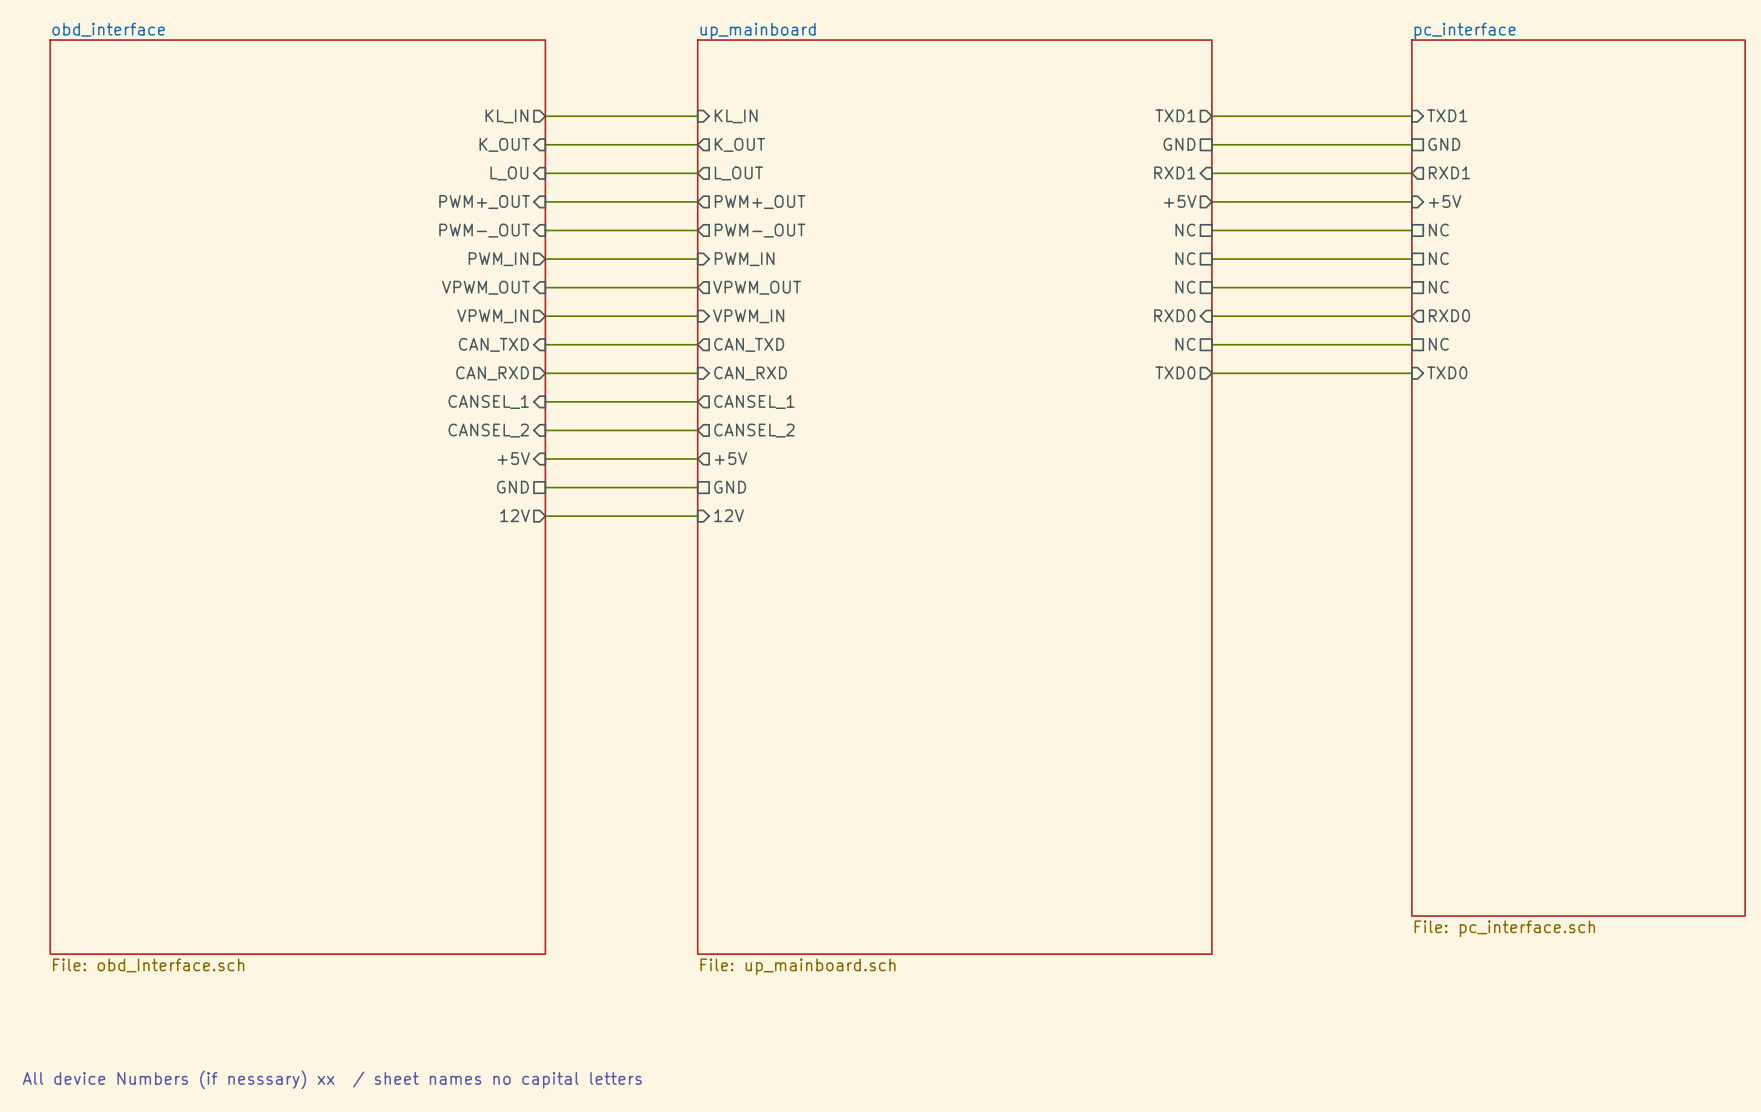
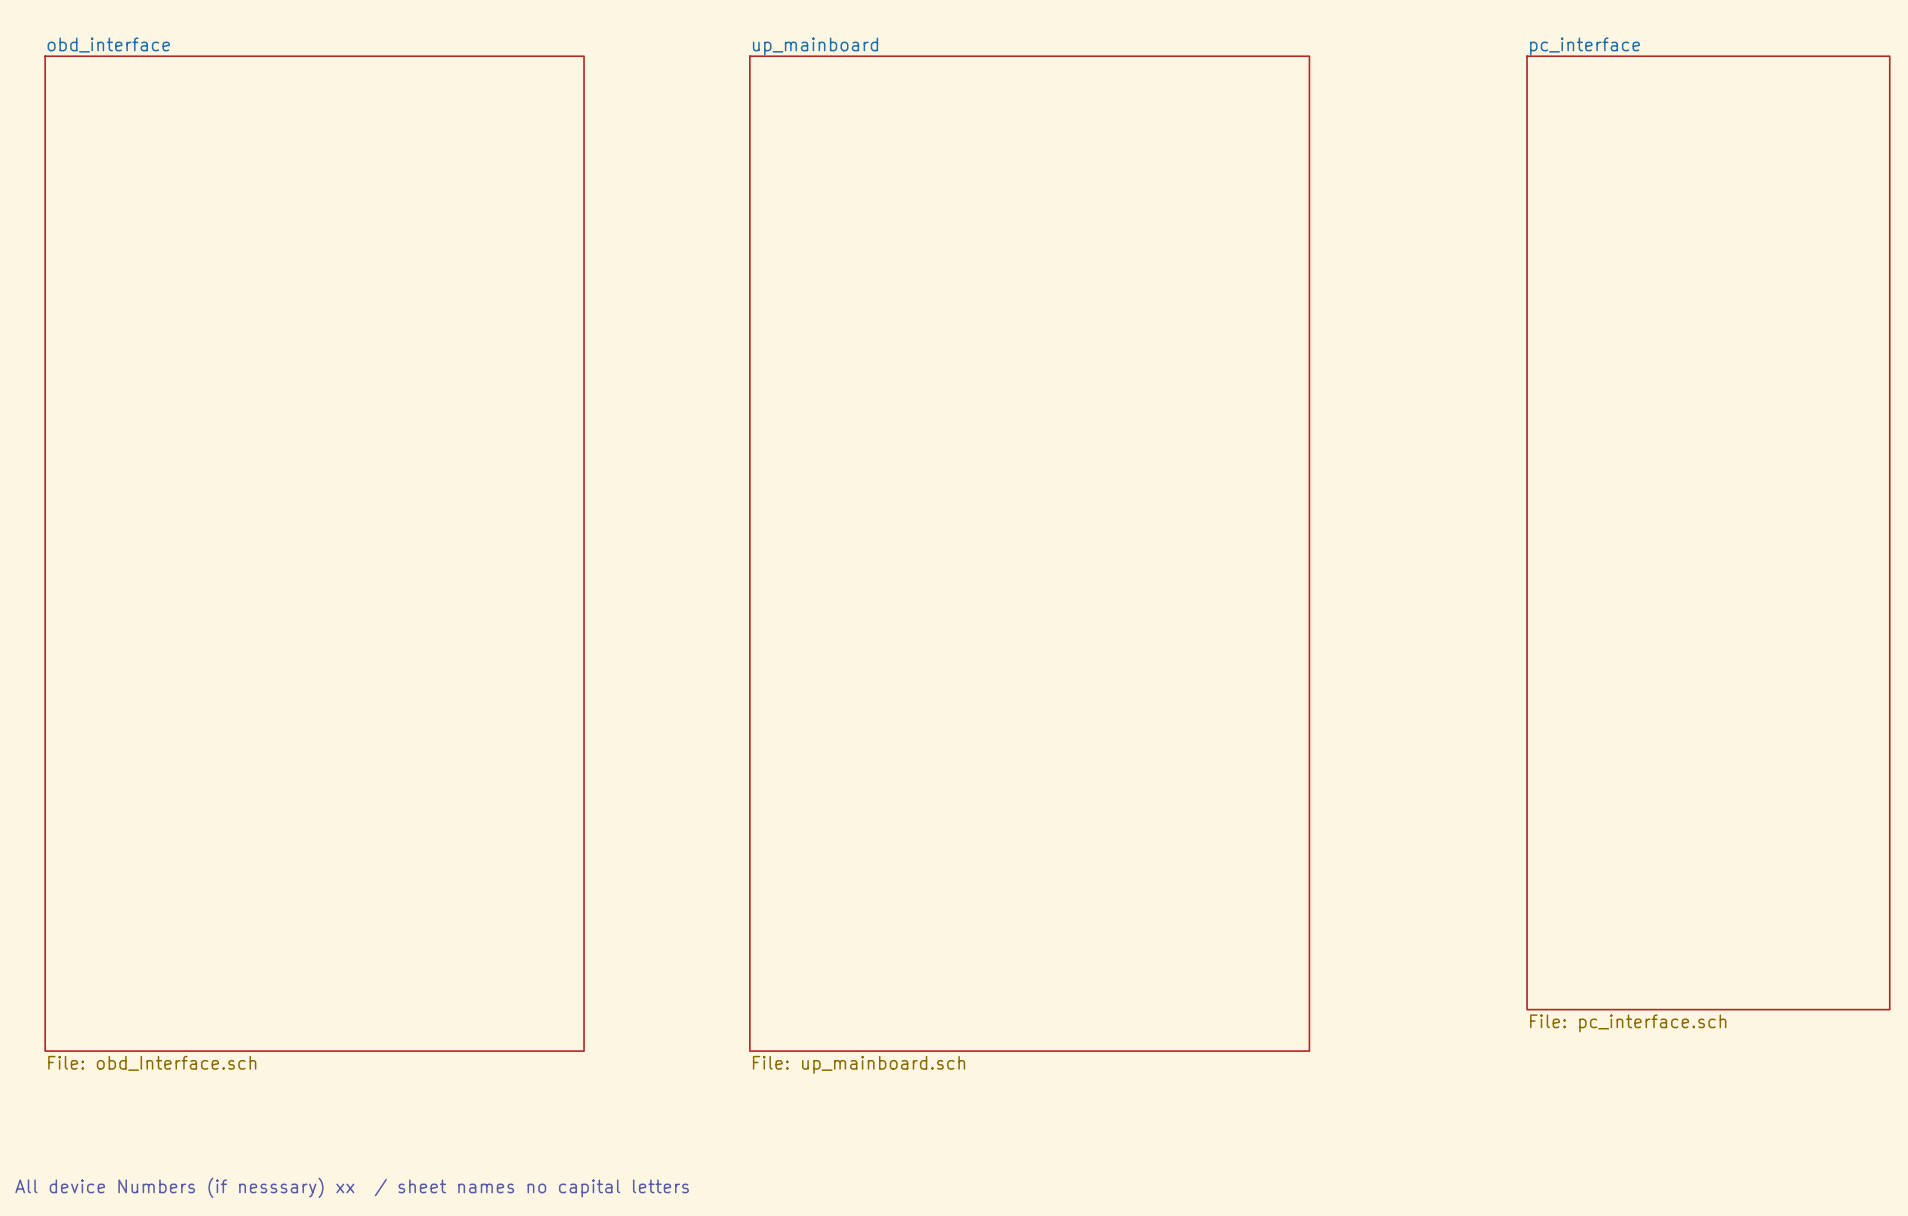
sheet pin: TXD1 (1175, 115) -> none
sheet pin: TXD1 (1447, 115) -> none
sheet pin: KL_IN (506, 116) -> none
wire: (545, 116) (697, 116) -> none
sheet pin: KL_IN (736, 116) -> none
wire: (1211, 116) (1411, 116) -> none
sheet pin: K_OUT (504, 144) -> none
wire: (545, 144) (697, 144) -> none
sheet pin: K_OUT (739, 144) -> none
sheet pin: GND (1179, 144) -> none
wire: (1211, 144) (1411, 144) -> none
sheet pin: GND (1444, 144) -> none
sheet pin: RXD1 (1174, 172) -> none
sheet pin: RXD1 (1449, 172) -> none
sheet pin: L_OU (509, 173) -> none
wire: (545, 173) (697, 173) -> none
sheet pin: L_OUT (738, 173) -> none
wire: (1211, 173) (1411, 173) -> none
wire: (545, 201) (697, 201) -> none
sheet pin: +5V (1180, 201) -> none
wire: (1211, 201) (1411, 201) -> none
sheet pin: +5V (1445, 201) -> none
sheet pin: PWM+_OUT (484, 202) -> none
sheet pin: PWM+_OUT (760, 202) -> none
sheet pin: PWM-_OUT (484, 230) -> none
wire: (545, 230) (697, 230) -> none
sheet pin: PWM-_OUT (760, 230) -> none
sheet pin: NC (1185, 230) -> none
wire: (1211, 230) (1411, 230) -> none
sheet pin: NC (1438, 230) -> none
sheet pin: NC (1185, 258) -> none
sheet pin: NC (1438, 258) -> none
sheet pin: PWM_IN (498, 259) -> none
wire: (545, 259) (697, 259) -> none
sheet pin: PWM_IN (744, 259) -> none
wire: (1211, 259) (1411, 259) -> none
sheet pin: VPWM_OUT (485, 287) -> none
wire: (545, 287) (697, 287) -> none
sheet pin: VPWM_OUT (757, 287) -> none
sheet pin: NC (1185, 287) -> none
wire: (1211, 287) (1411, 287) -> none
sheet pin: NC (1438, 287) -> none
sheet pin: RXD0 (1174, 315) -> none
sheet pin: RXD0 (1449, 315) -> none
sheet pin: VPWM_IN (492, 316) -> none
wire: (545, 316) (697, 316) -> none
sheet pin: VPWM_IN (748, 316) -> none
wire: (1211, 316) (1411, 316) -> none
sheet pin: CAN_TXD (493, 344) -> none
wire: (545, 344) (697, 344) -> none
sheet pin: CAN_TXD (749, 344) -> none
sheet pin: NC (1185, 344) -> none
wire: (1211, 344) (1411, 344) -> none
sheet pin: NC (1438, 344) -> none
sheet pin: TXD0 (1175, 372) -> none
sheet pin: TXD0 (1447, 372) -> none
sheet pin: CAN_RXD (492, 373) -> none
wire: (545, 373) (697, 373) -> none
sheet pin: CAN_RXD (750, 373) -> none
wire: (1211, 373) (1411, 373) -> none
sheet pin: CANSEL_1 (488, 401) -> none
wire: (545, 401) (697, 401) -> none
sheet pin: CANSEL_1 (754, 401) -> none
sheet pin: CANSEL_2 (488, 430) -> none
wire: (545, 430) (697, 430) -> none
sheet pin: CANSEL_2 (754, 430) -> none
sheet pin: +5V (513, 458) -> none
sheet pin: +5V (730, 458) -> none
wire: (545, 459) (697, 459) -> none
sheet pin: GND (512, 487) -> none
wire: (545, 487) (697, 487) -> none
sheet pin: GND (730, 487) -> none
sheet pin: 12V (515, 515) -> none
sheet pin: 12V (729, 515) -> none
wire: (545, 516) (697, 516) -> none

